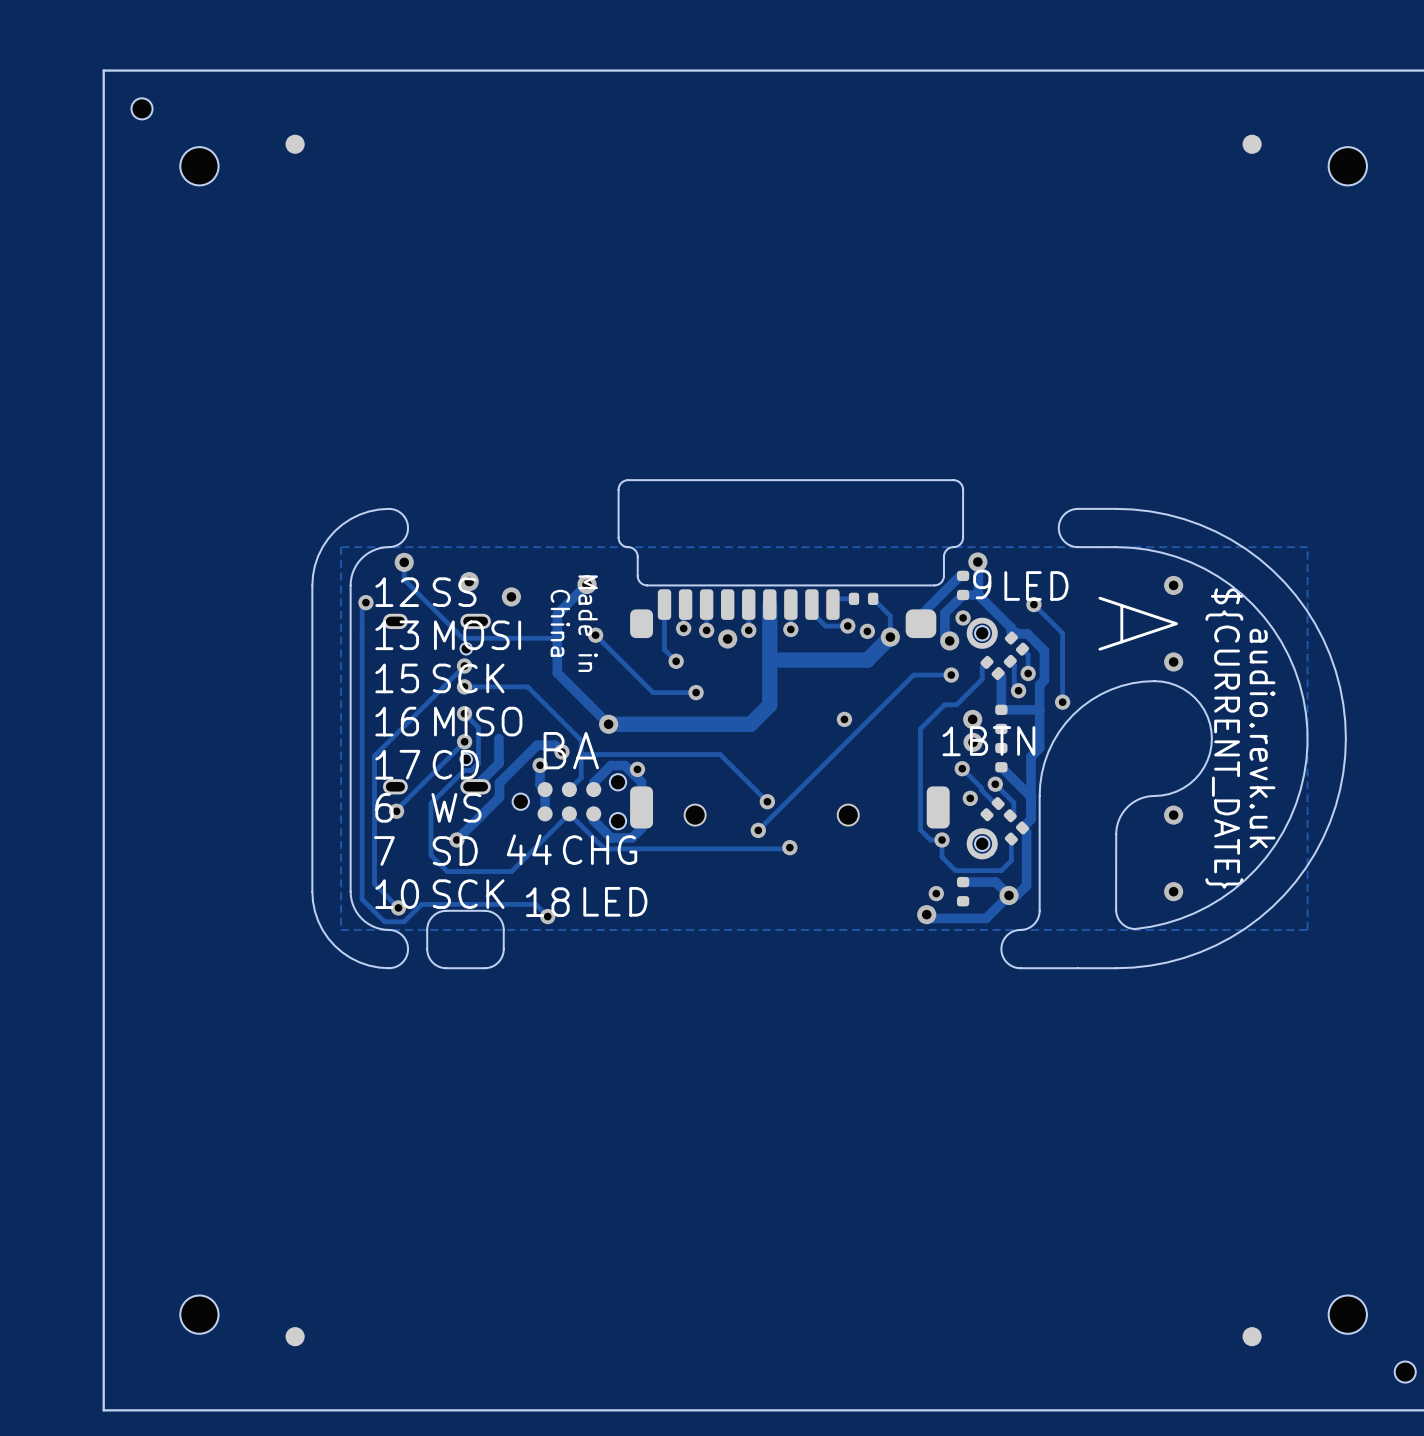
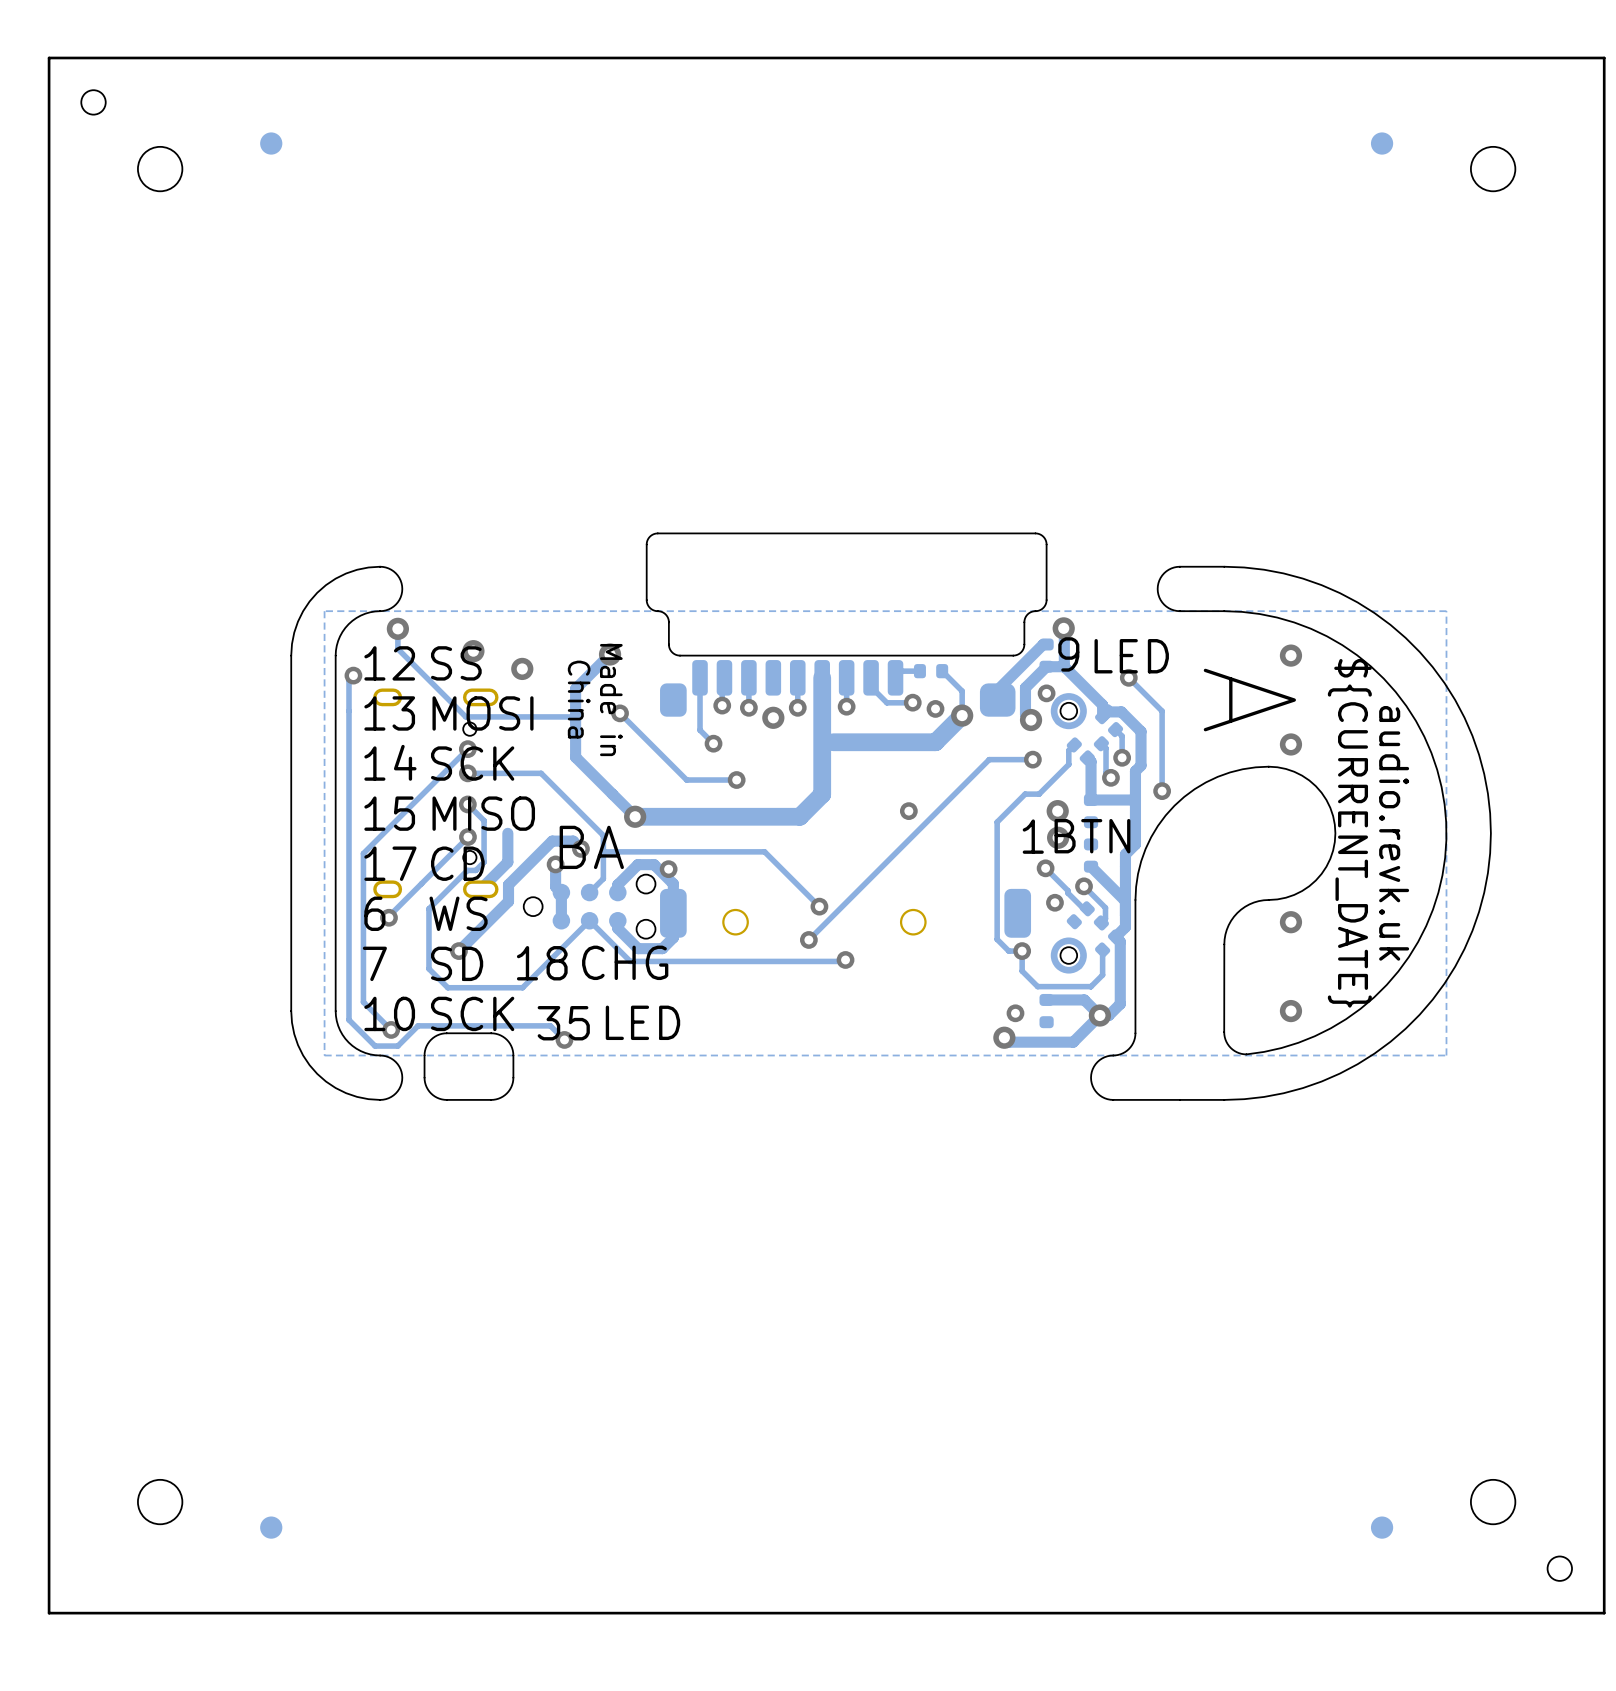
text: 15 (397, 678) -> 14 (390, 762)
text: 16 (397, 721) -> 15 (389, 813)
text: 44 (529, 849) -> 18 (542, 963)
text: 18 (547, 902) -> 35 (563, 1023)

